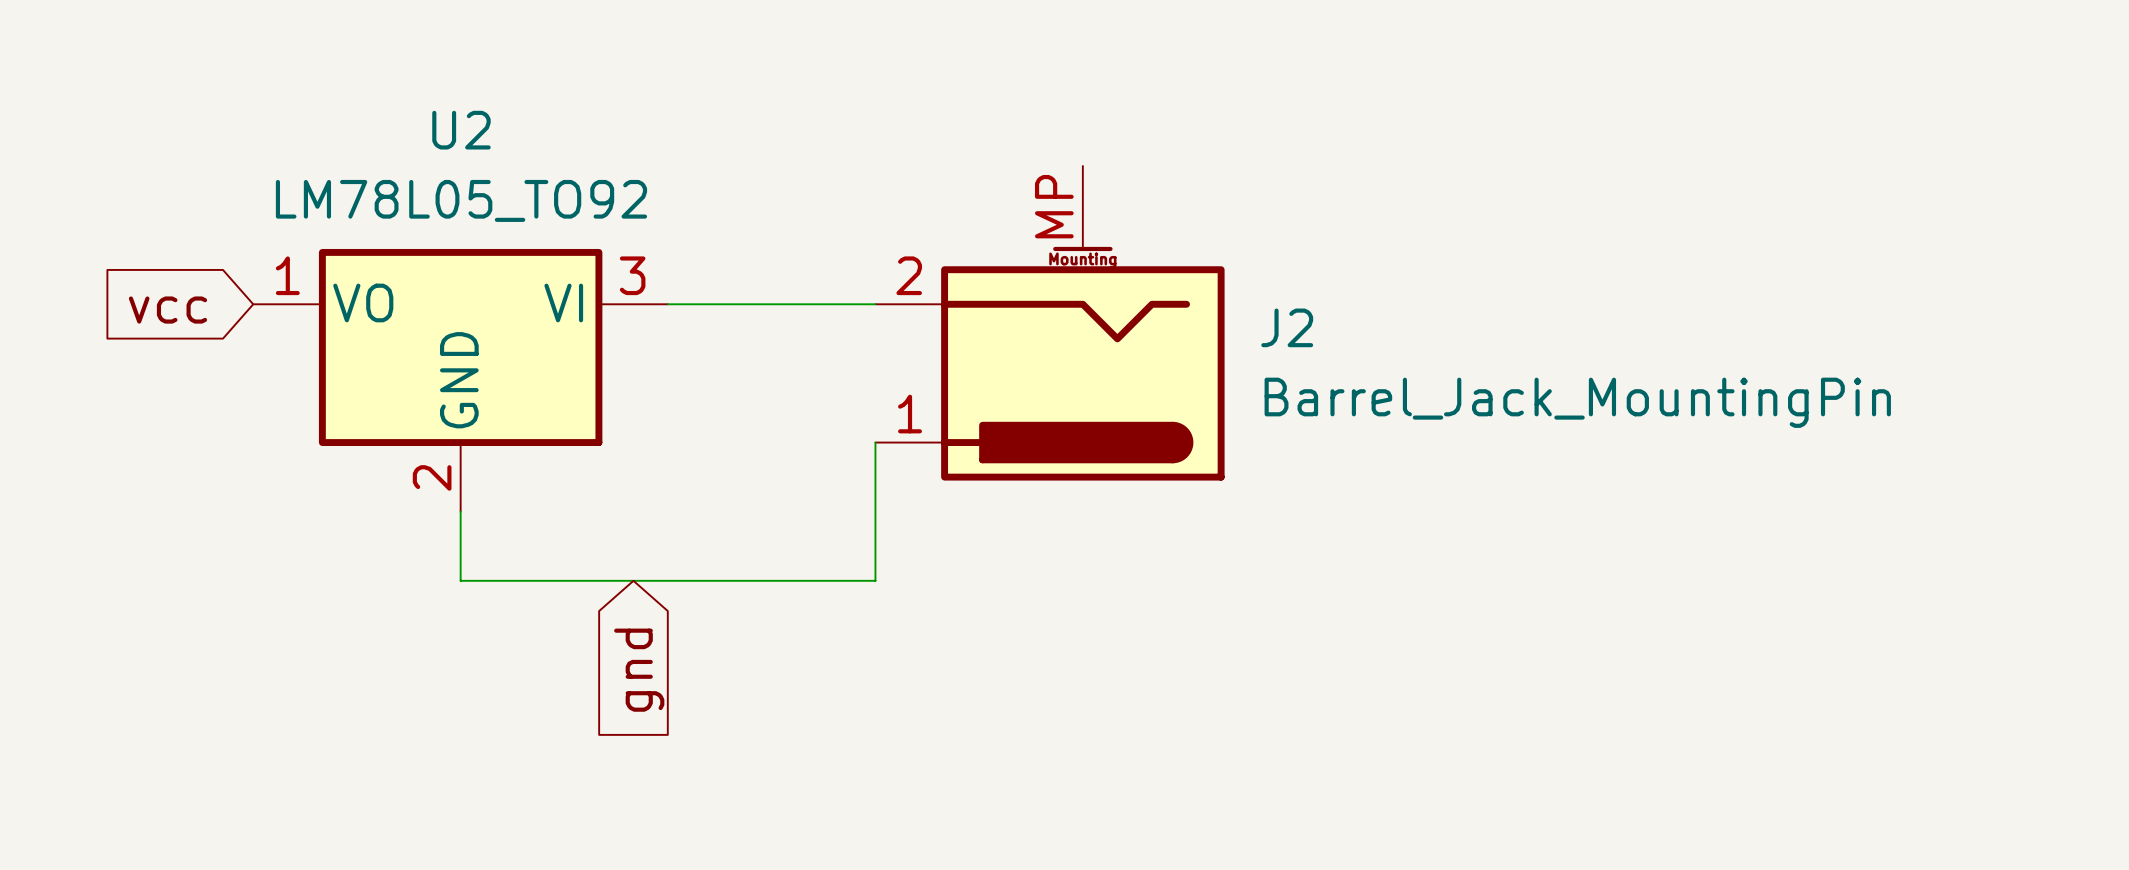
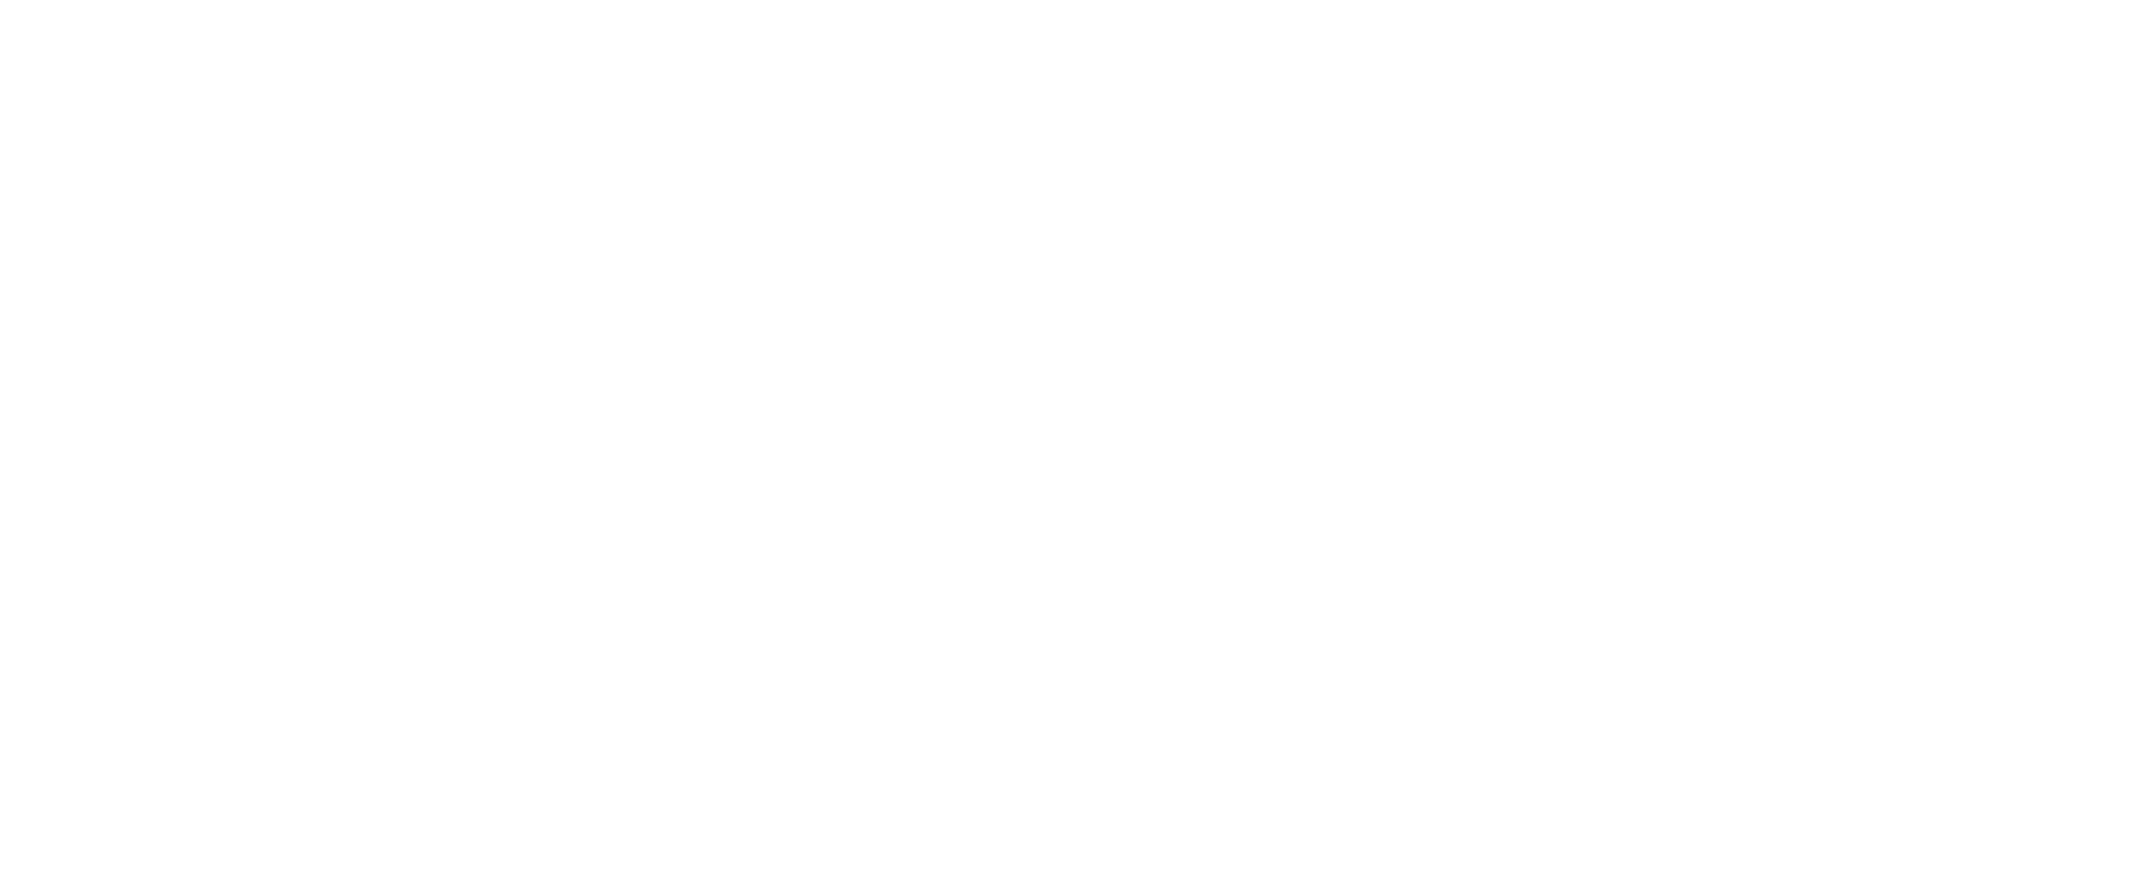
wire: (668, 304) (875, 304) -> none
global label: vcc (168, 310) -> none
J2: Barrel_Jack_MountingPin (1050, 323) -> none
U2: LM78L05_TO92 (460, 380) -> none
wire: (875, 442) (875, 580) (460, 580) (460, 511) -> none
global label: gnd (639, 670) -> none

